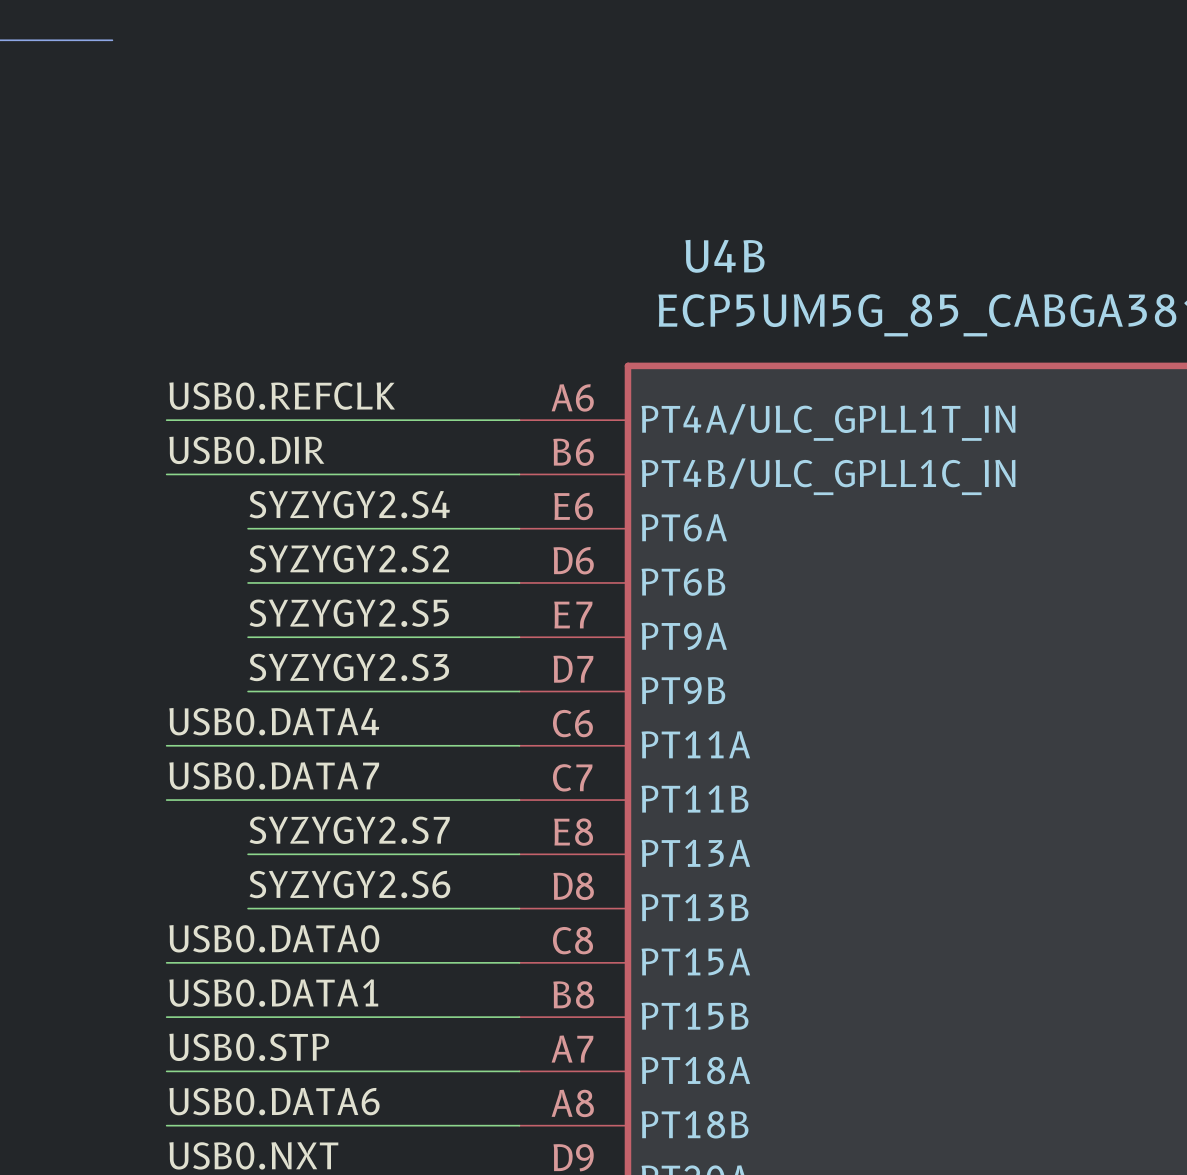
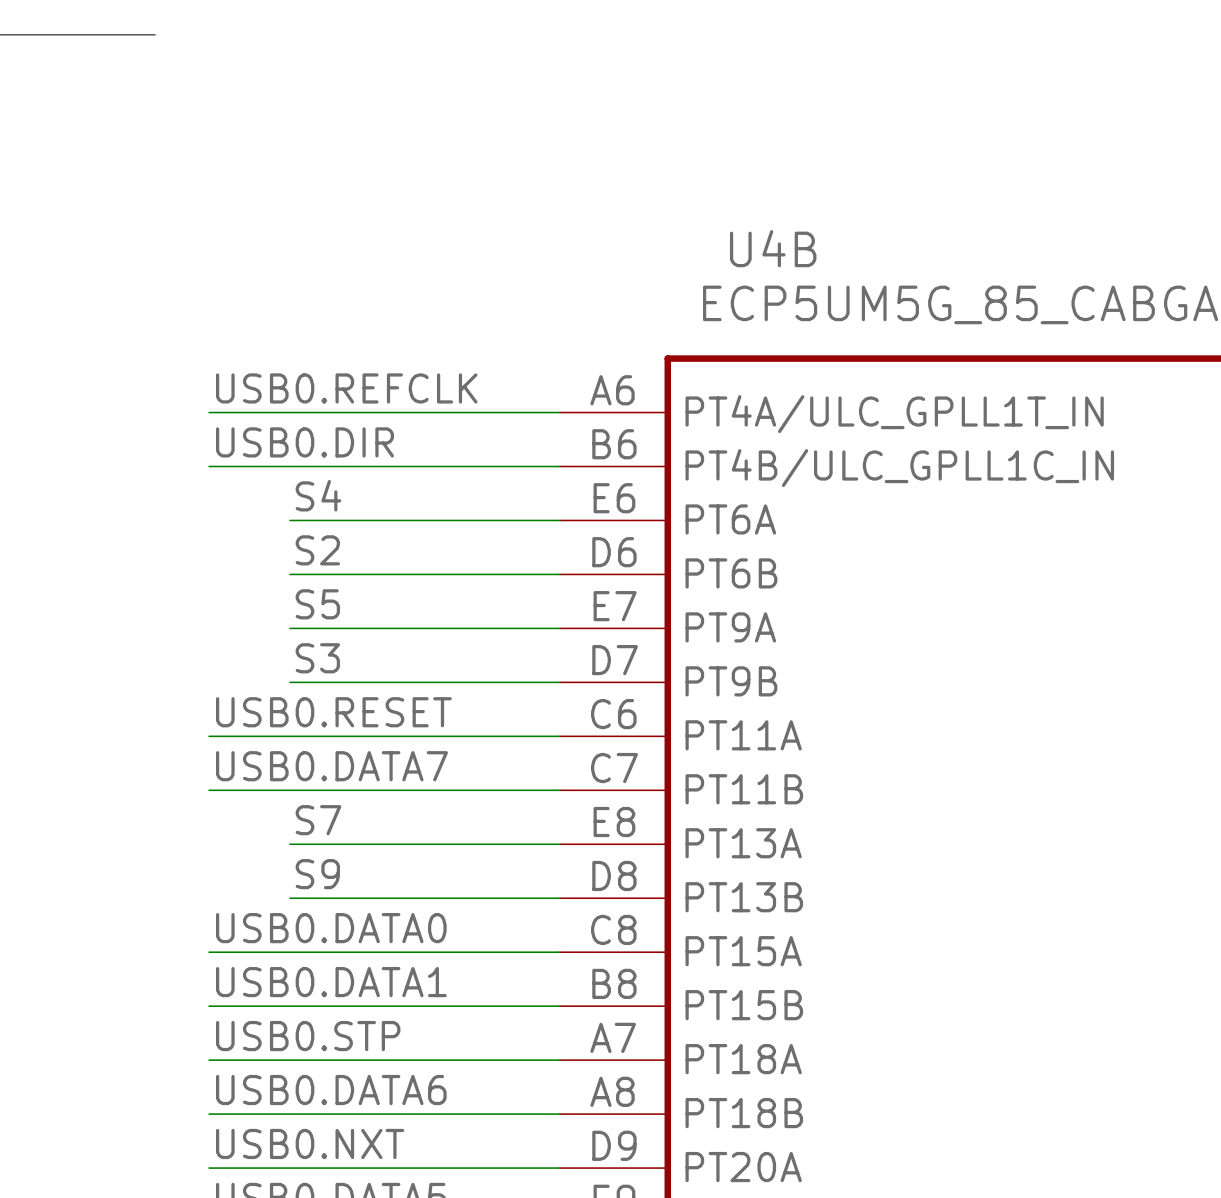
label: SYZYGY2.S4 (349, 504) -> S4 (318, 495)
label: SYZYGY2.S2 (349, 558) -> S2 (317, 550)
label: SYZYGY2.S5 (349, 613) -> S5 (317, 604)
label: SYZYGY2.S3 (349, 667) -> S3 (317, 658)
label: USB0.DATA4 (274, 721) -> USB0.RESET (333, 712)
label: SYZYGY2.S7 (349, 830) -> S7 (318, 820)
label: SYZYGY2.S6 (349, 884) -> S9 (317, 874)

